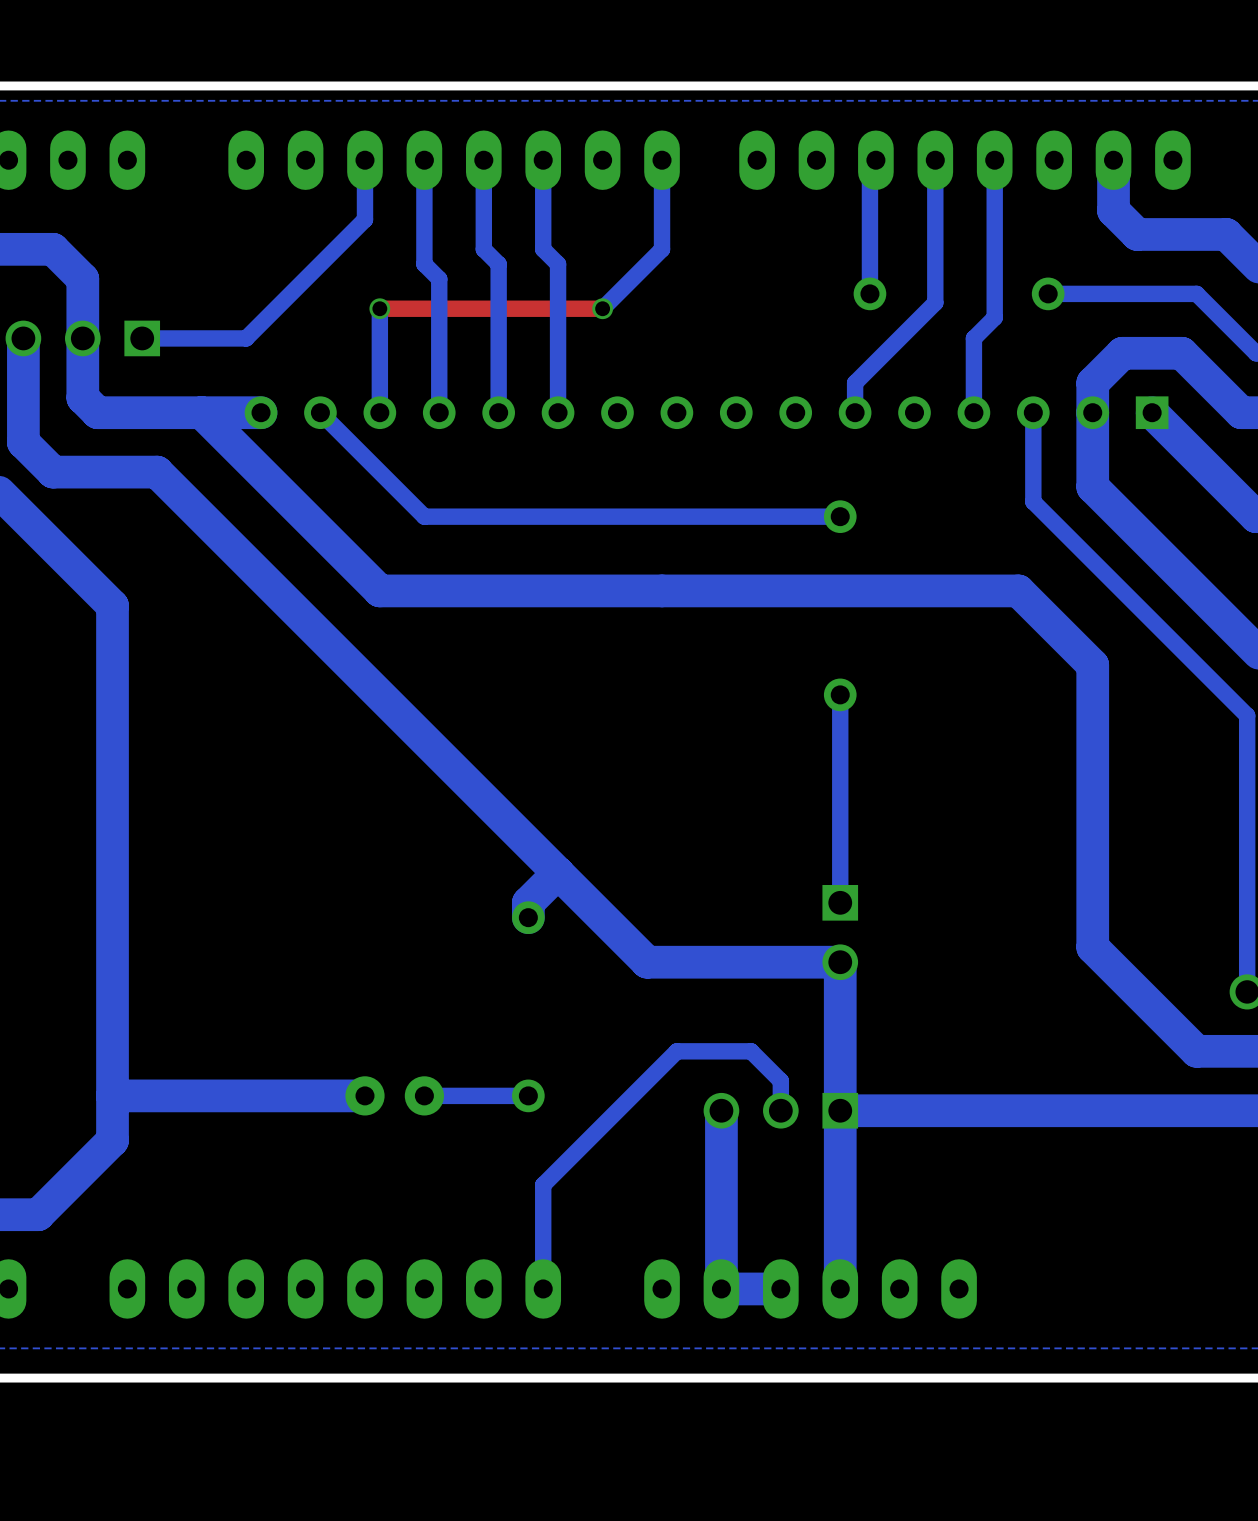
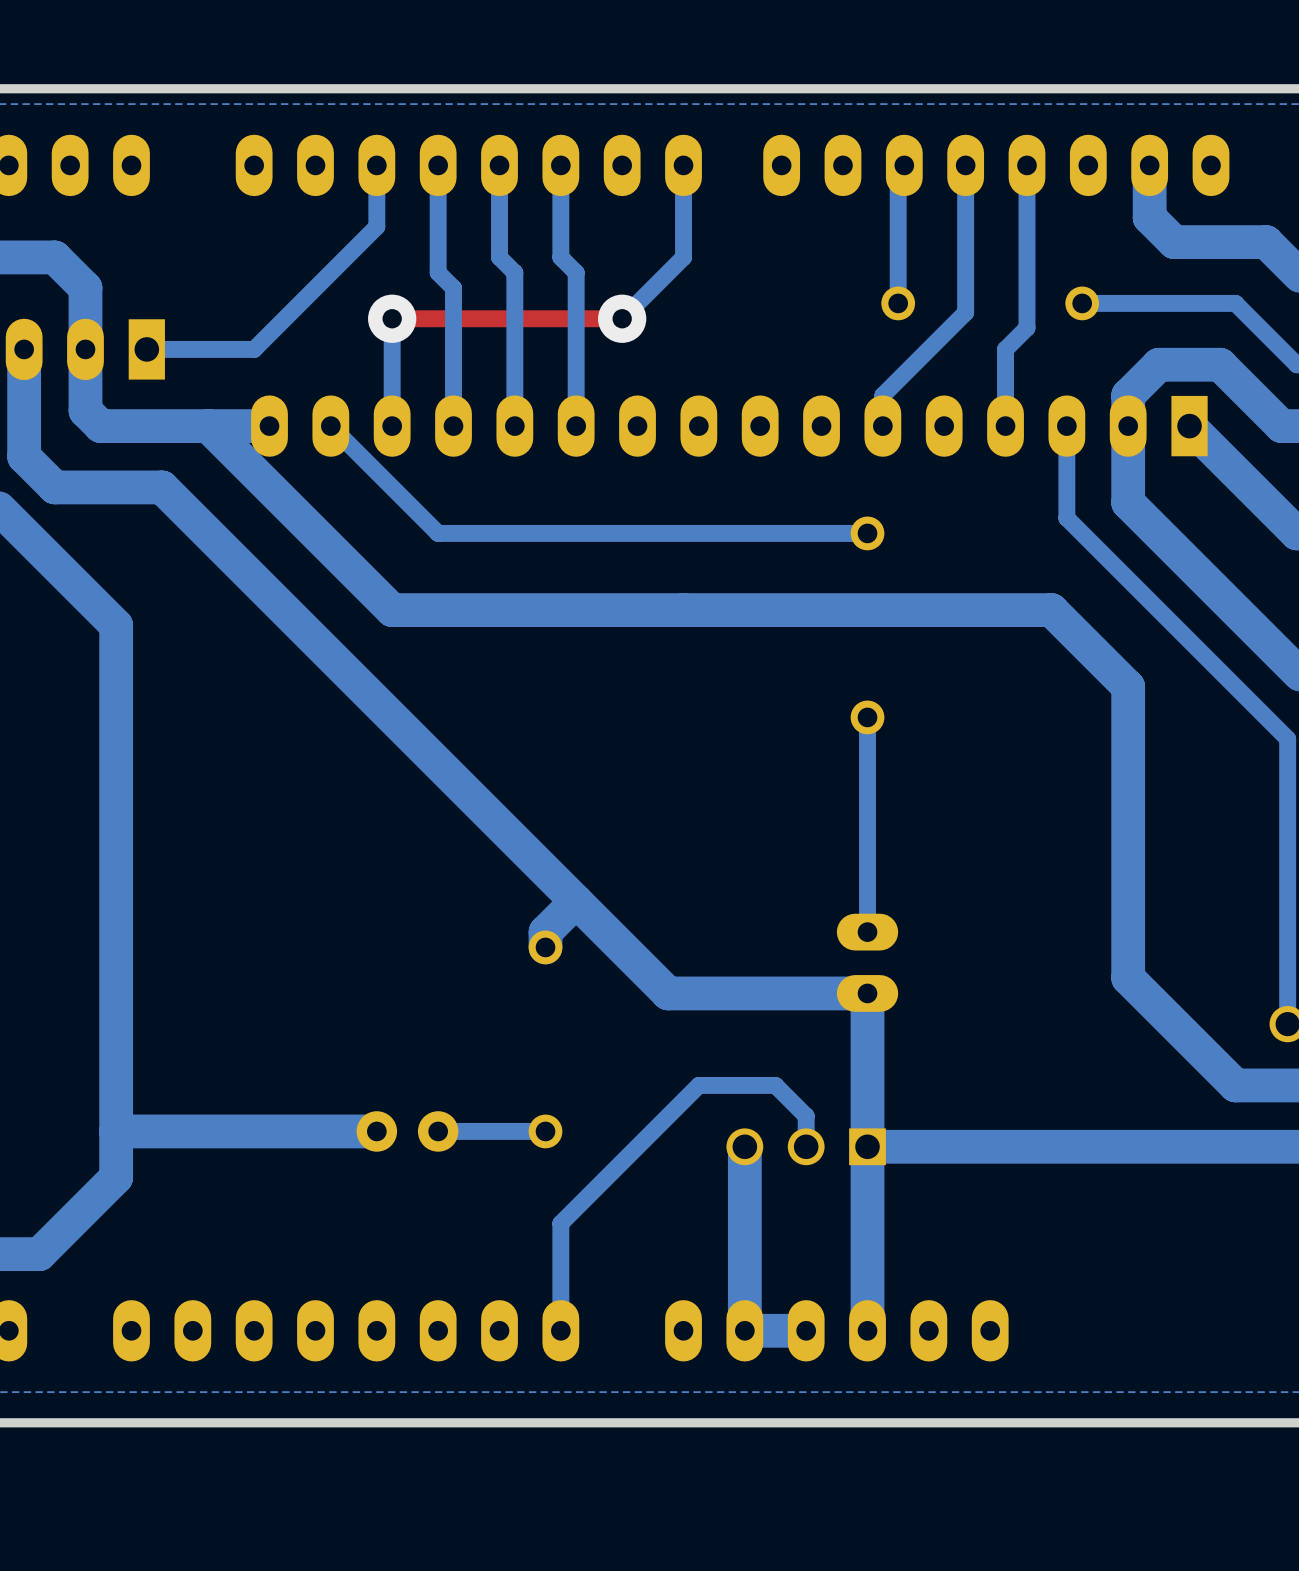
via size: [369, 298, 391, 320] -> [368, 294, 417, 343]
via size: [592, 298, 614, 320] -> [598, 294, 647, 343]
part footprint: [5, 320, 161, 357] -> [5, 318, 165, 381]
part footprint: [244, 396, 1169, 430] -> [251, 395, 1208, 457]
part footprint: [822, 884, 859, 981] -> [836, 913, 899, 1012]

